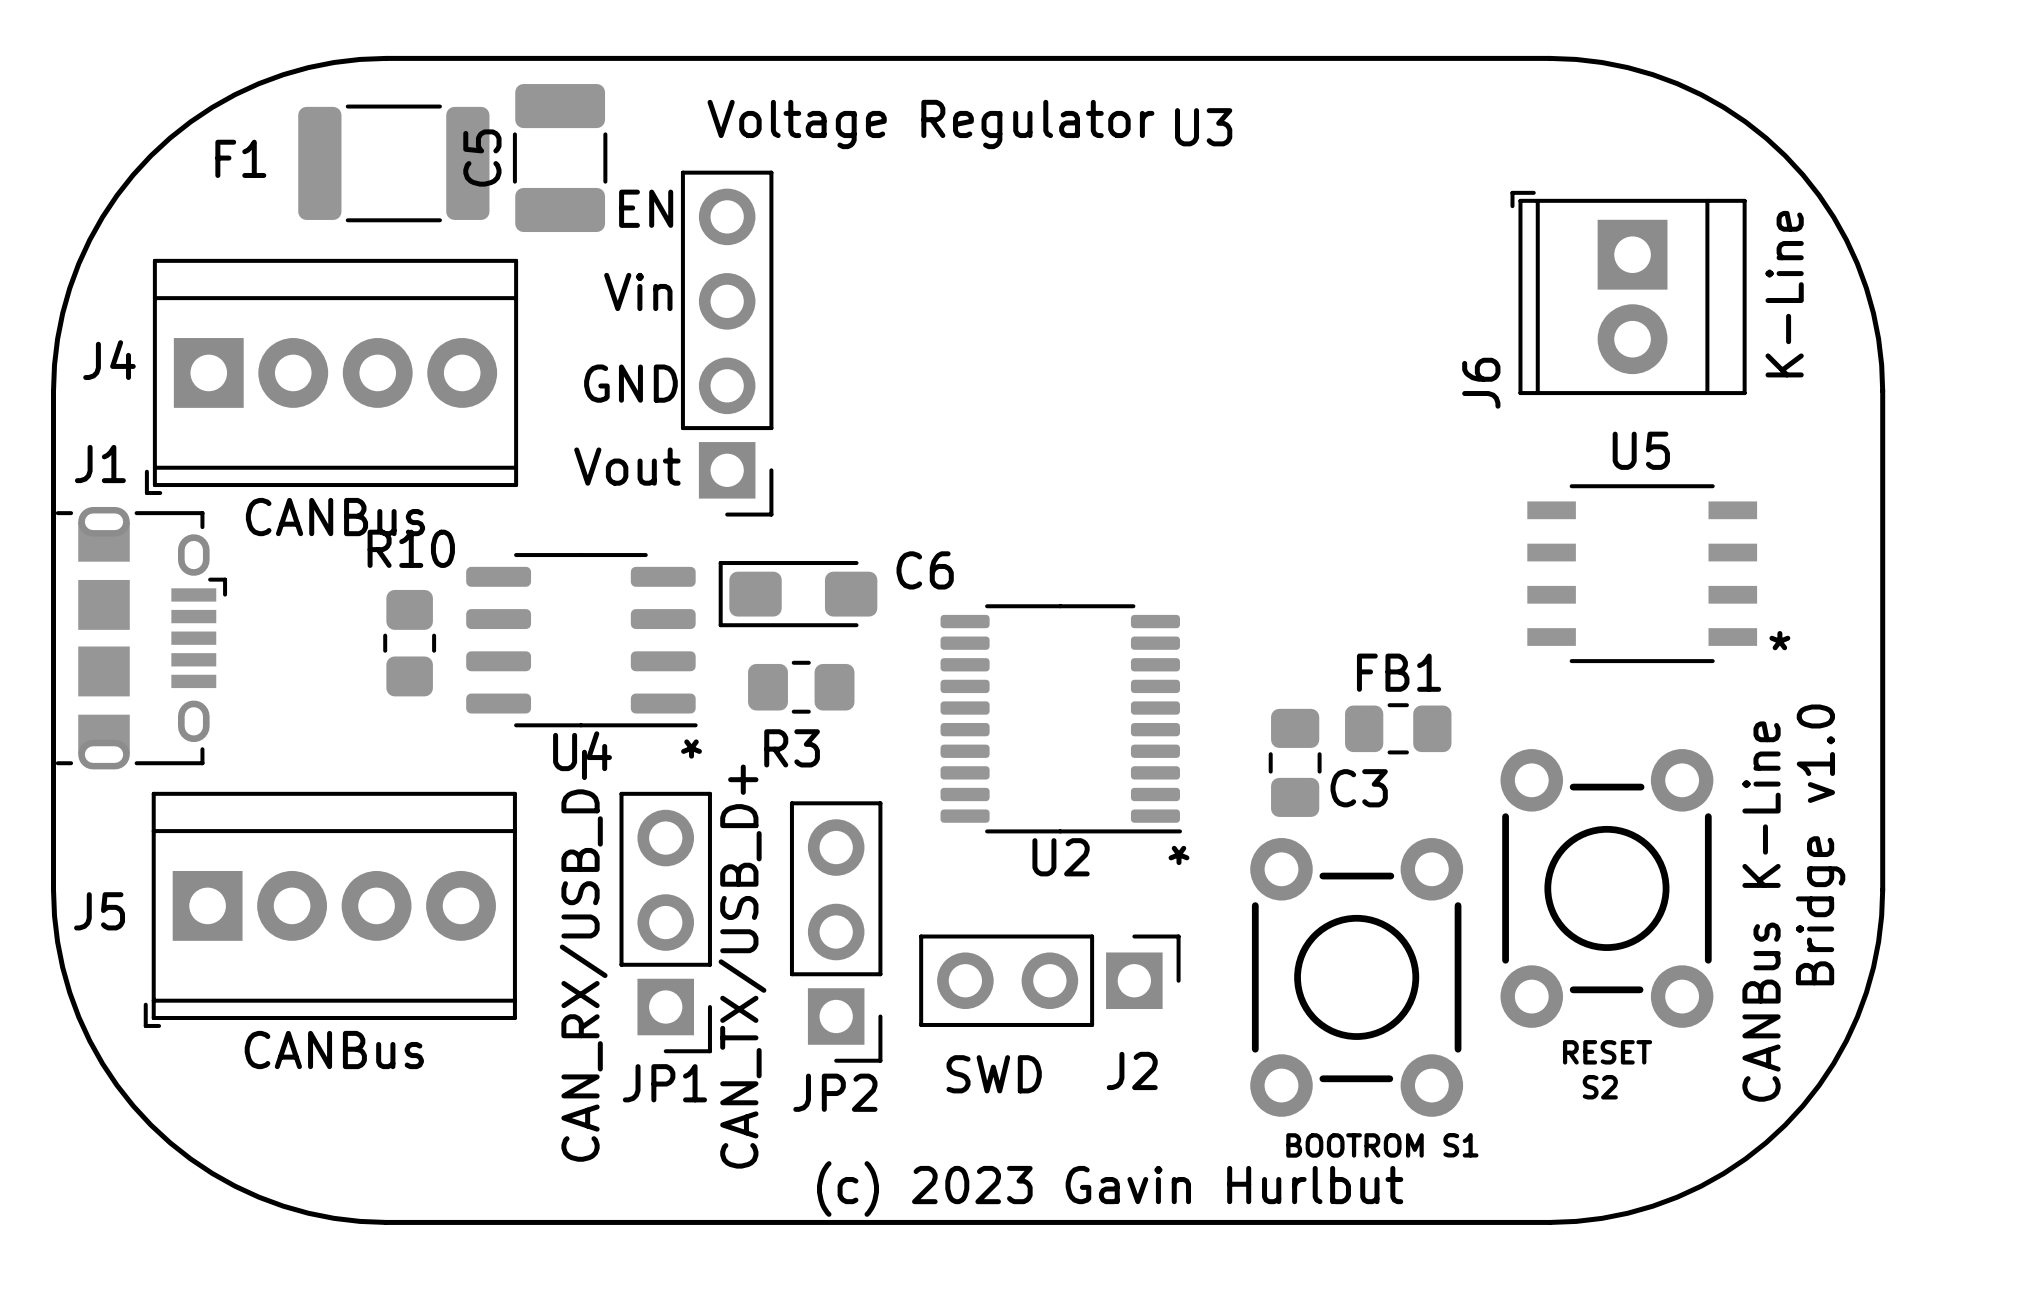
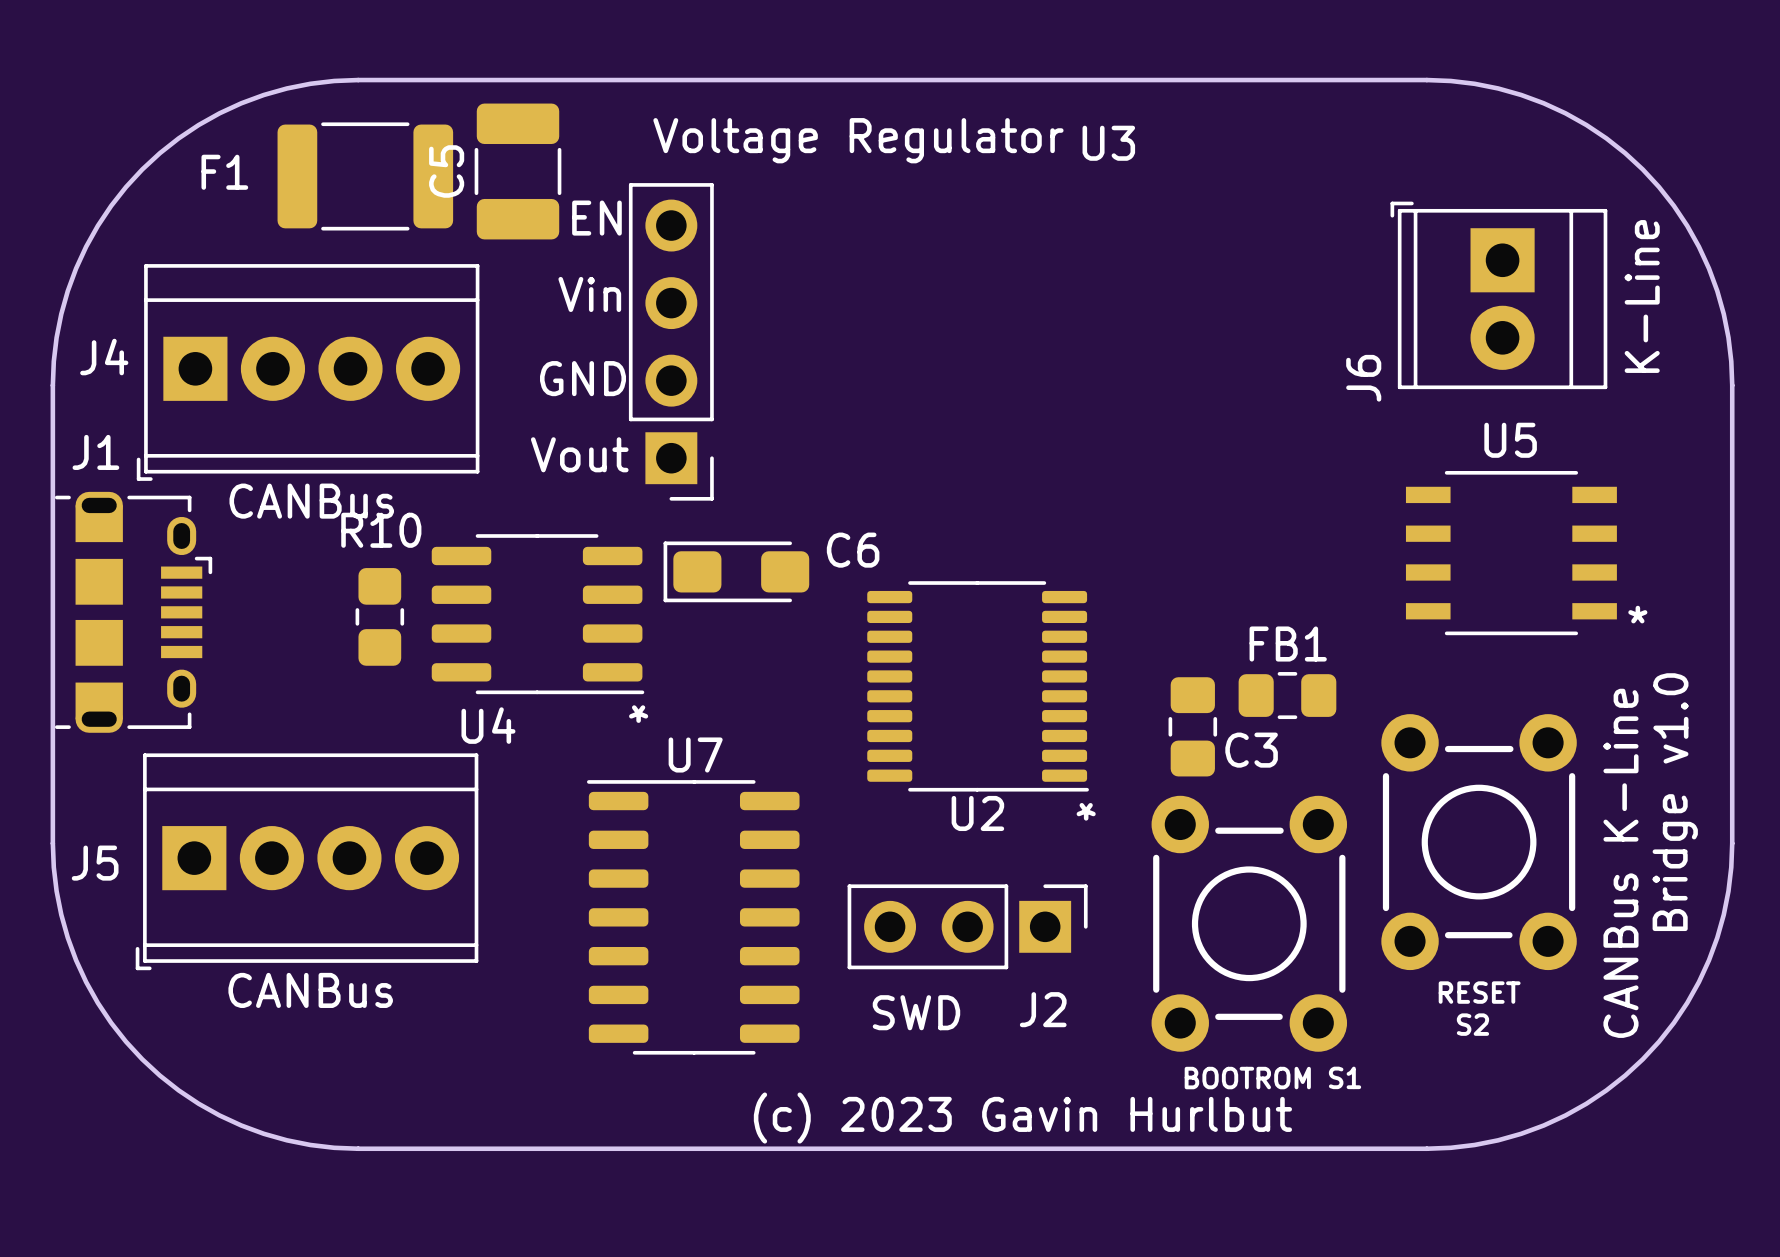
R3: (801, 687) -> none
U4 name position: U4 (582, 751) -> U4 (488, 725)
JP1: CAN_RX/USB_D- (665, 922) -> none
JP2: CAN_TX/USB_D+ (836, 932) -> none
U7: none -> (693, 917)

